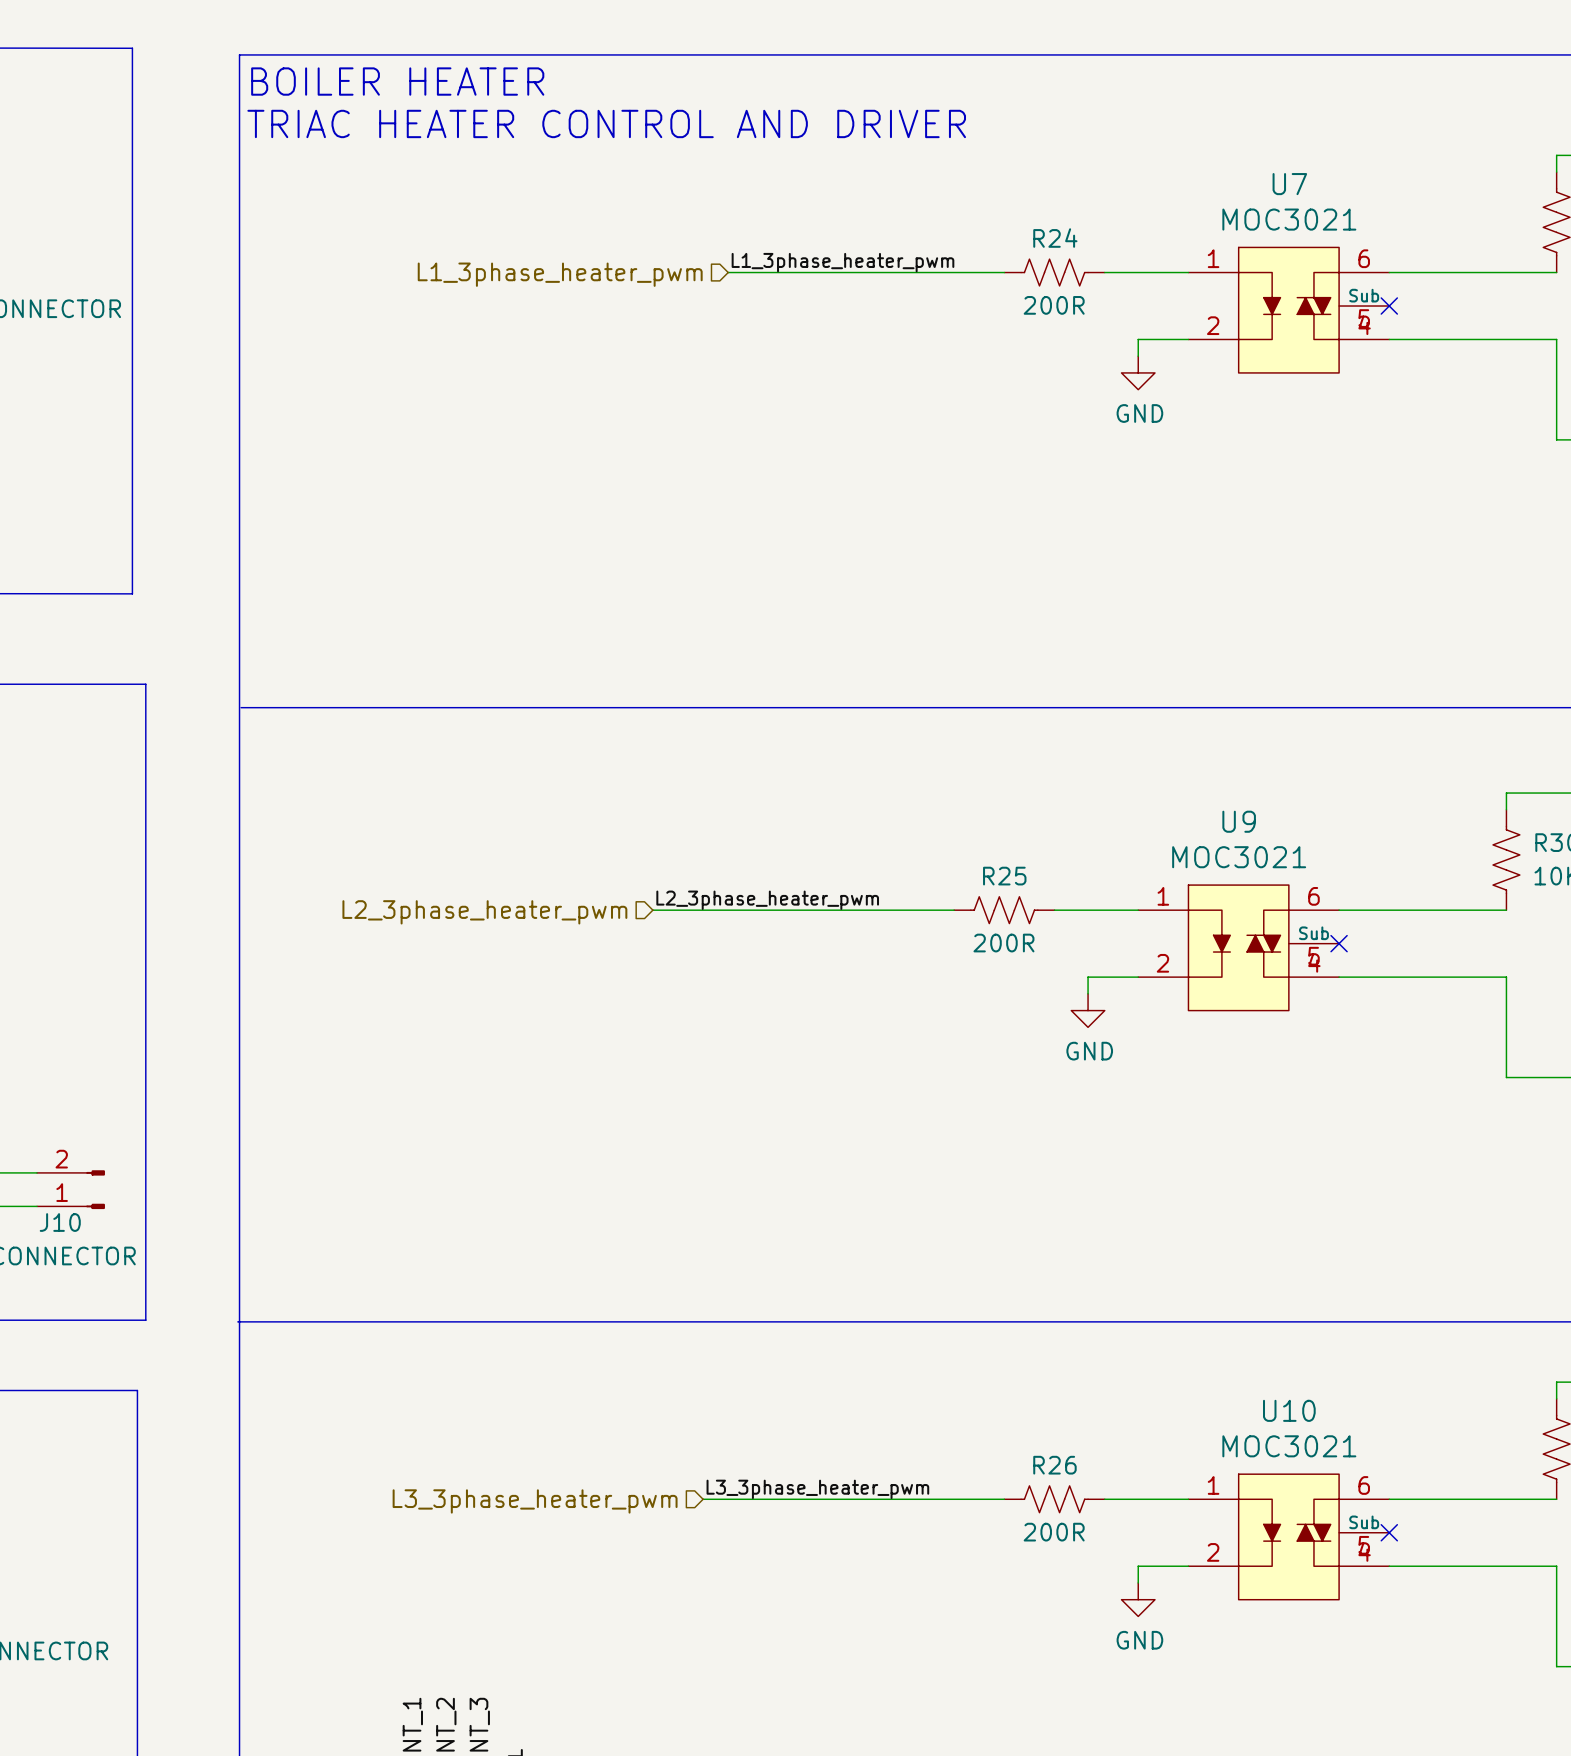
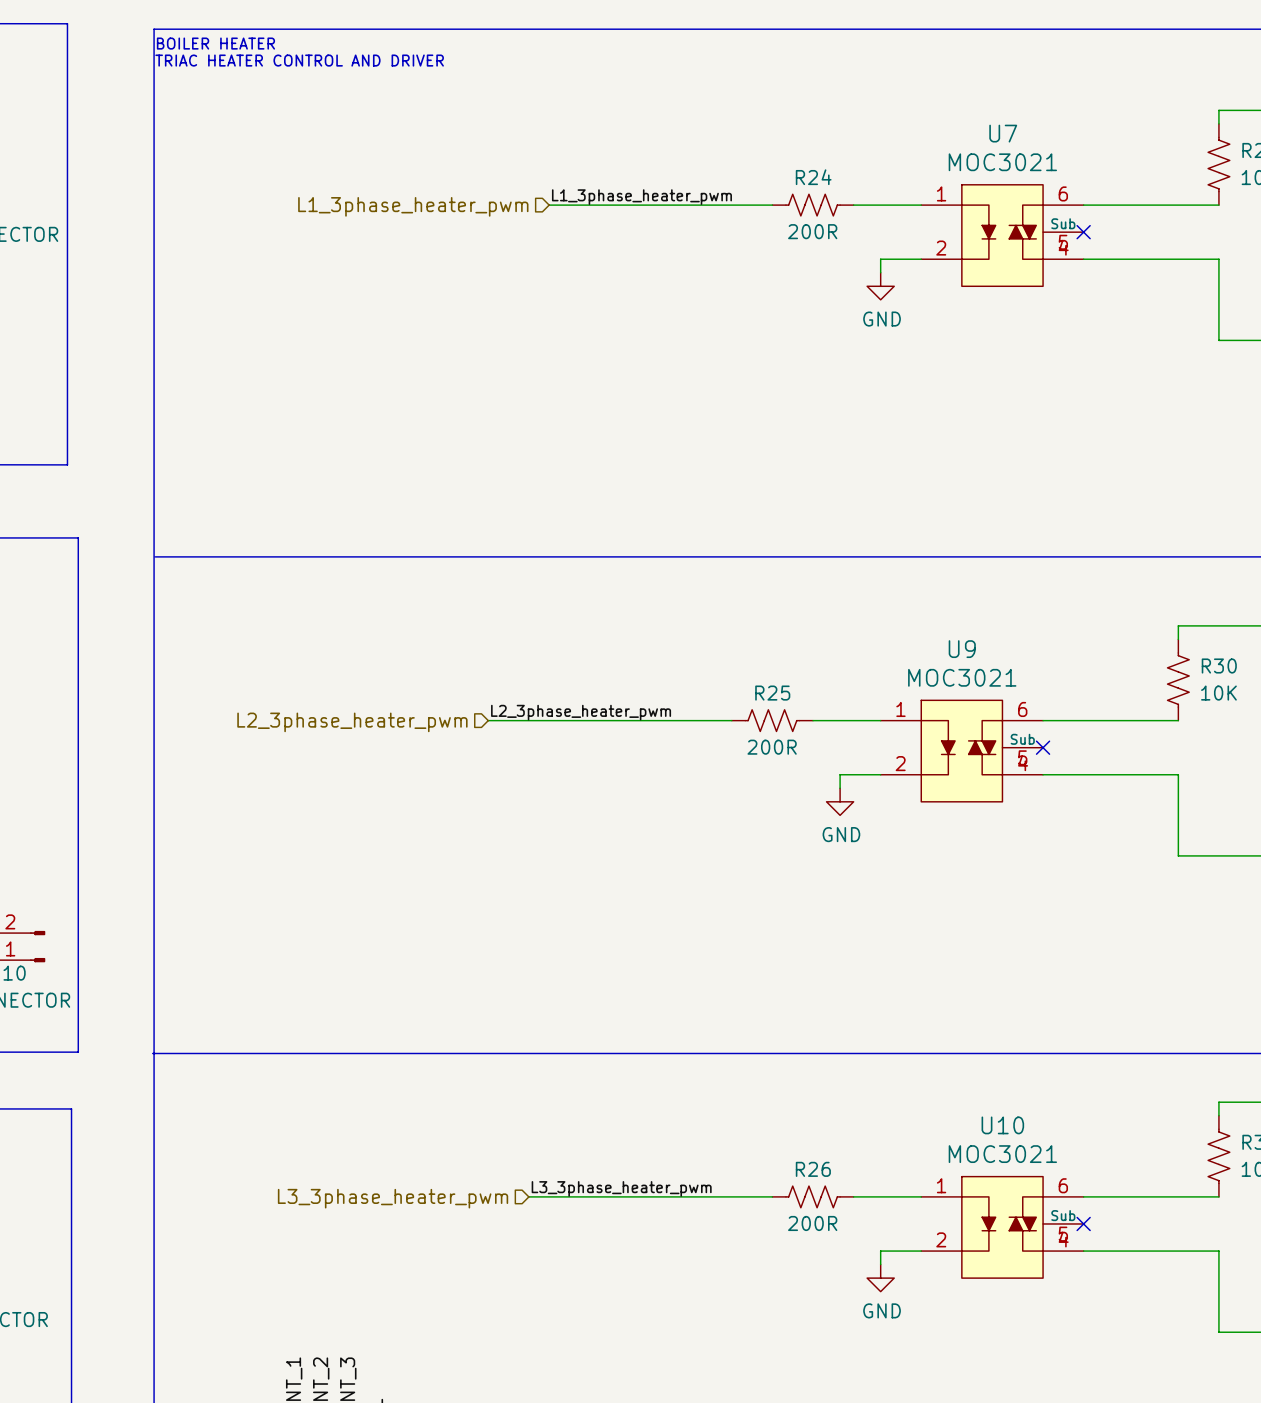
text: none -> BOILER HEATER (215, 43)
text: BOILER HEATER (397, 81) -> TRIAC HEATER CONTROL AND DRIVER (299, 60)
text: TRIAC HEATER CONTROL AND DRIVER (606, 123) -> none

